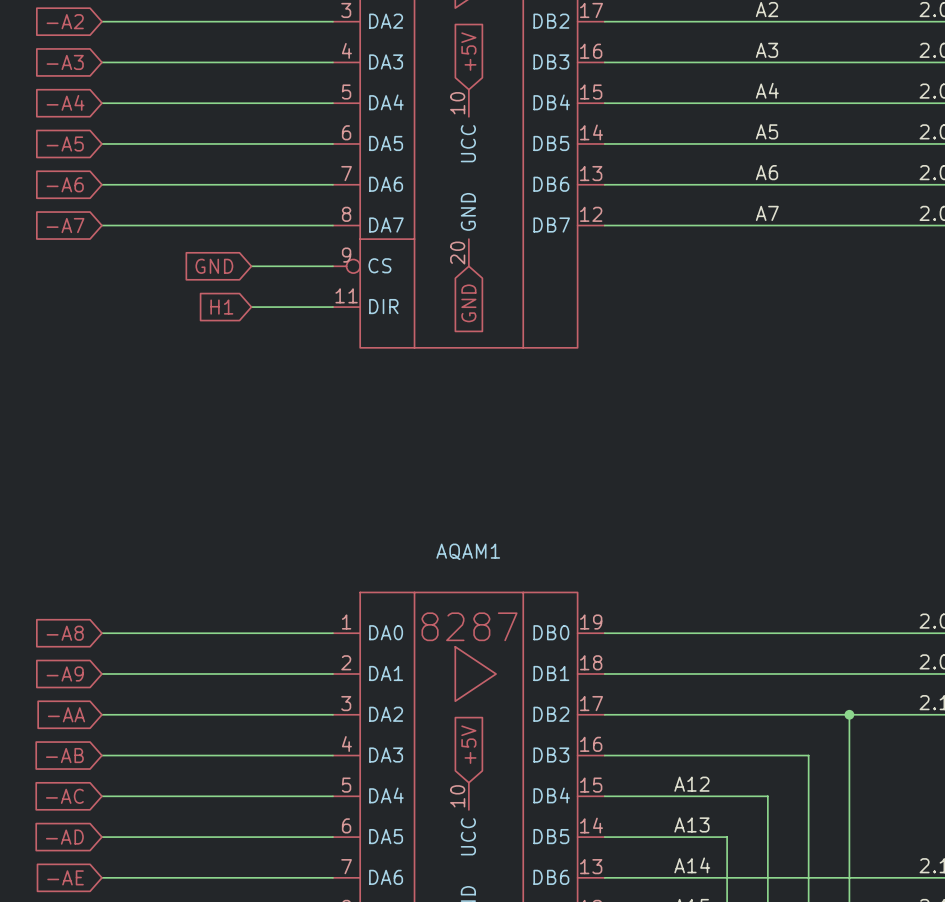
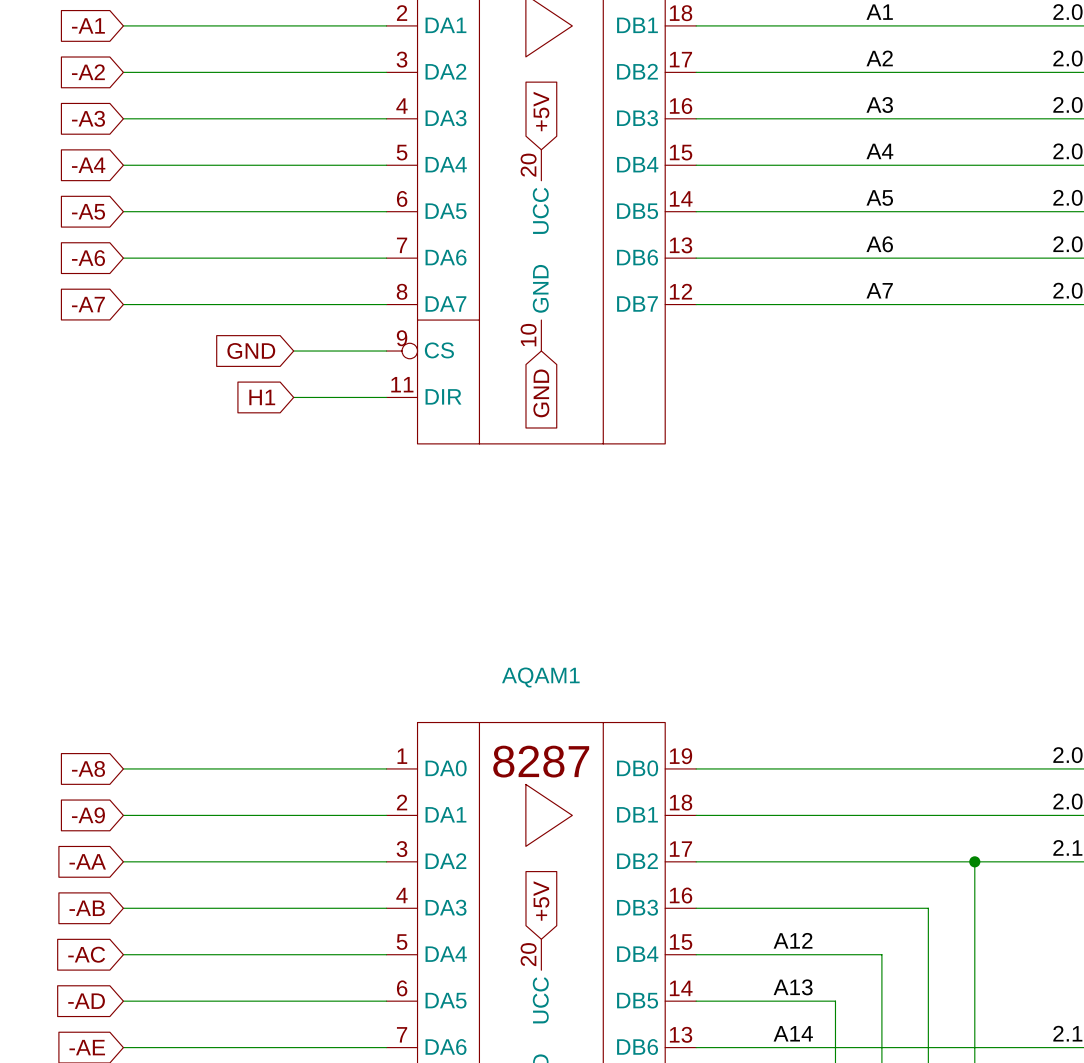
part pin number: 10 (457, 103) -> 20 (528, 165)
part pin number: 20 (457, 253) -> 10 (528, 335)
AQAM1 pin number: 10 (457, 796) -> 20 (528, 954)

